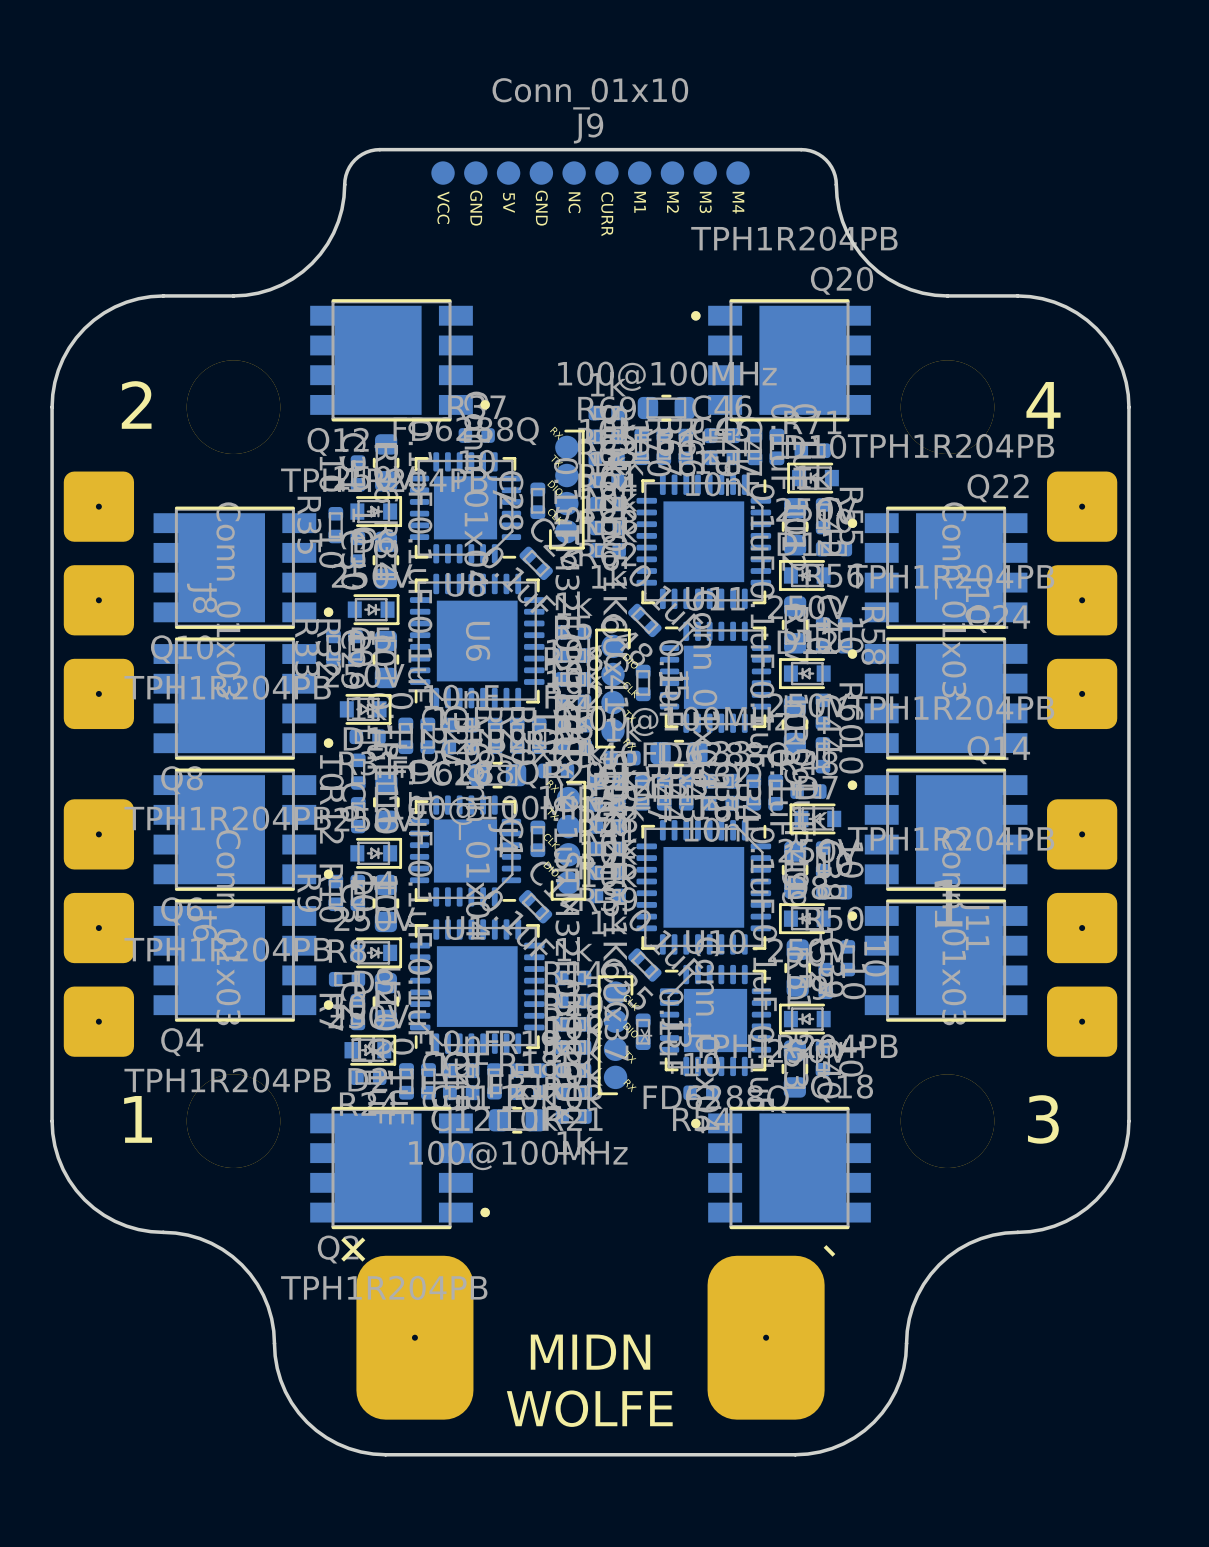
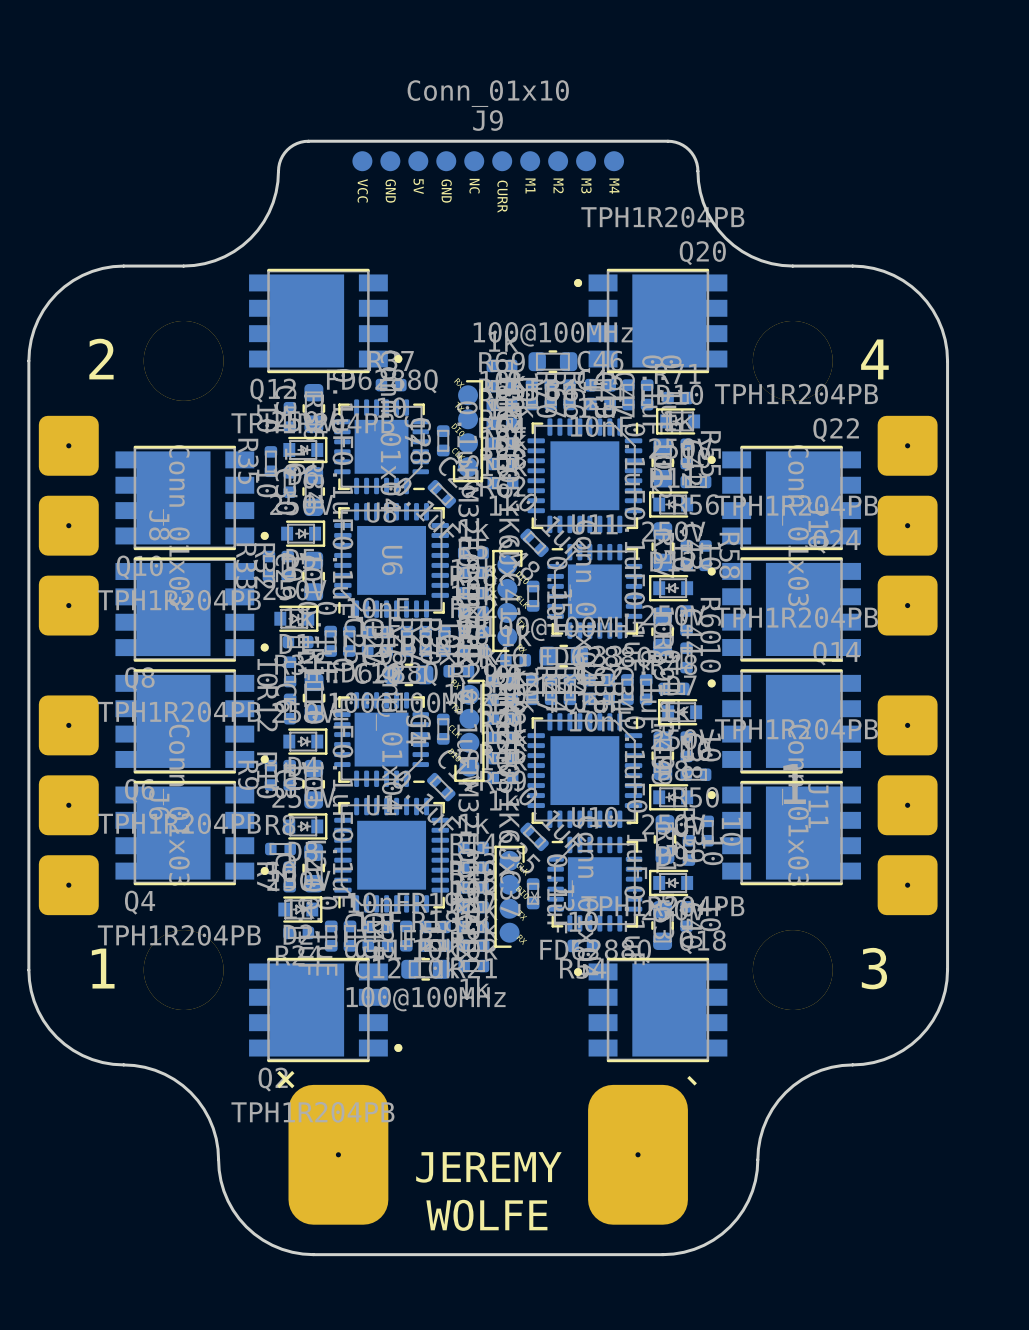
text: MIDN (590, 1352) -> JEREMY (488, 1167)

